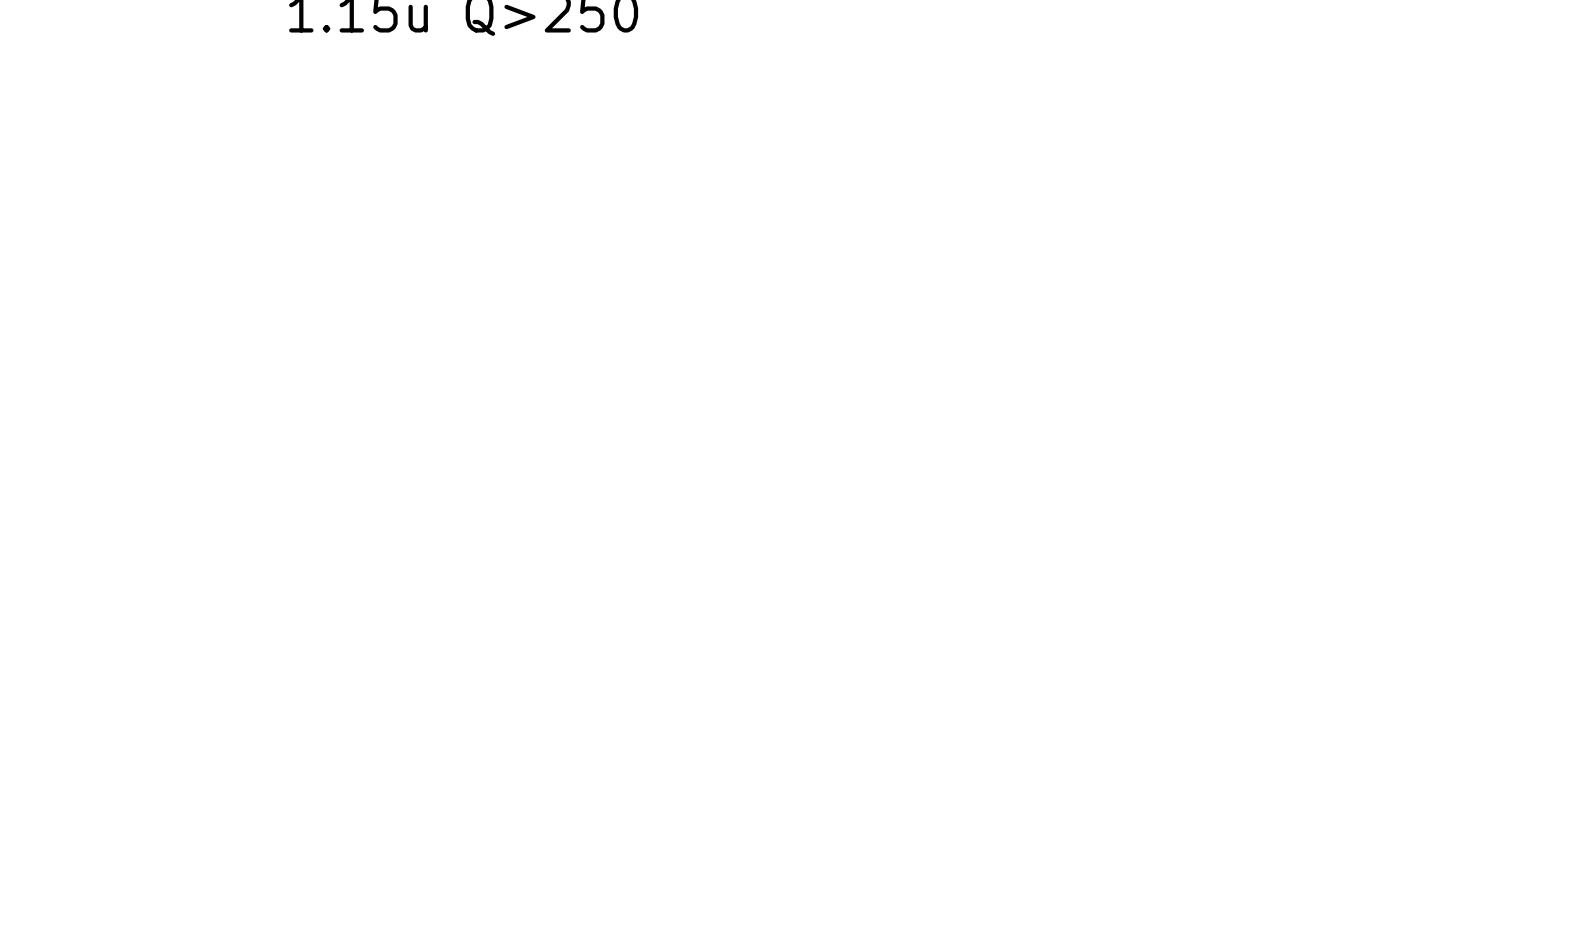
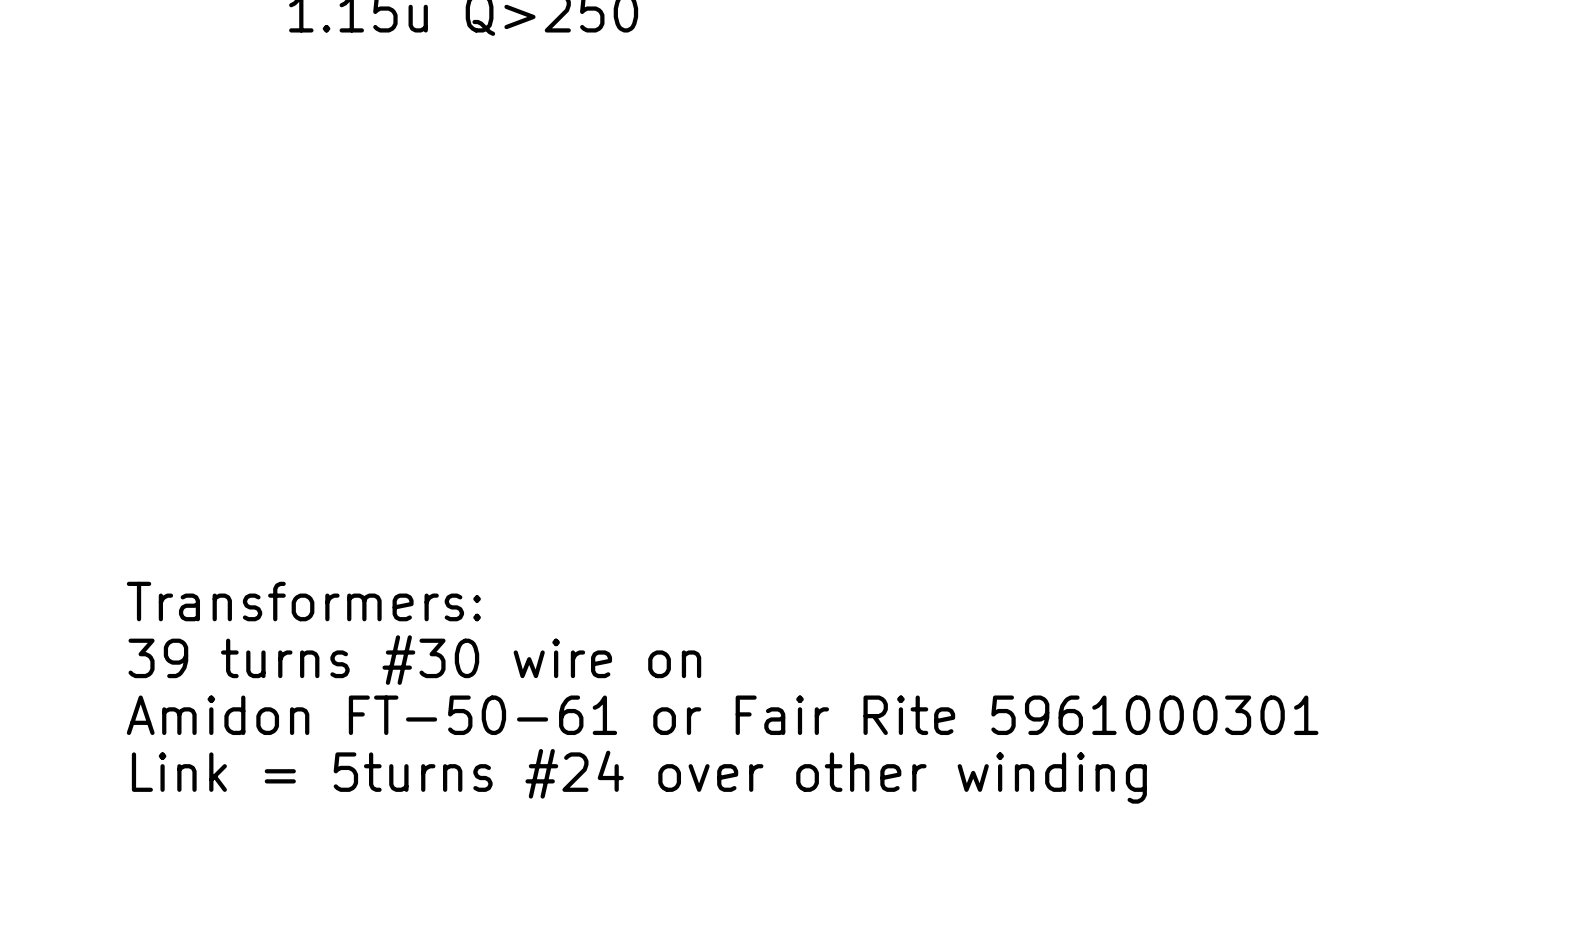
text: none -> Transformers: (303, 601)
text: none -> 39 turns #30 wire on (414, 660)
text: none -> Amidon FT-50-61 or Fair Rite 5961000301 (722, 715)
text: none -> Link = 5turns #24 over other winding (639, 776)

